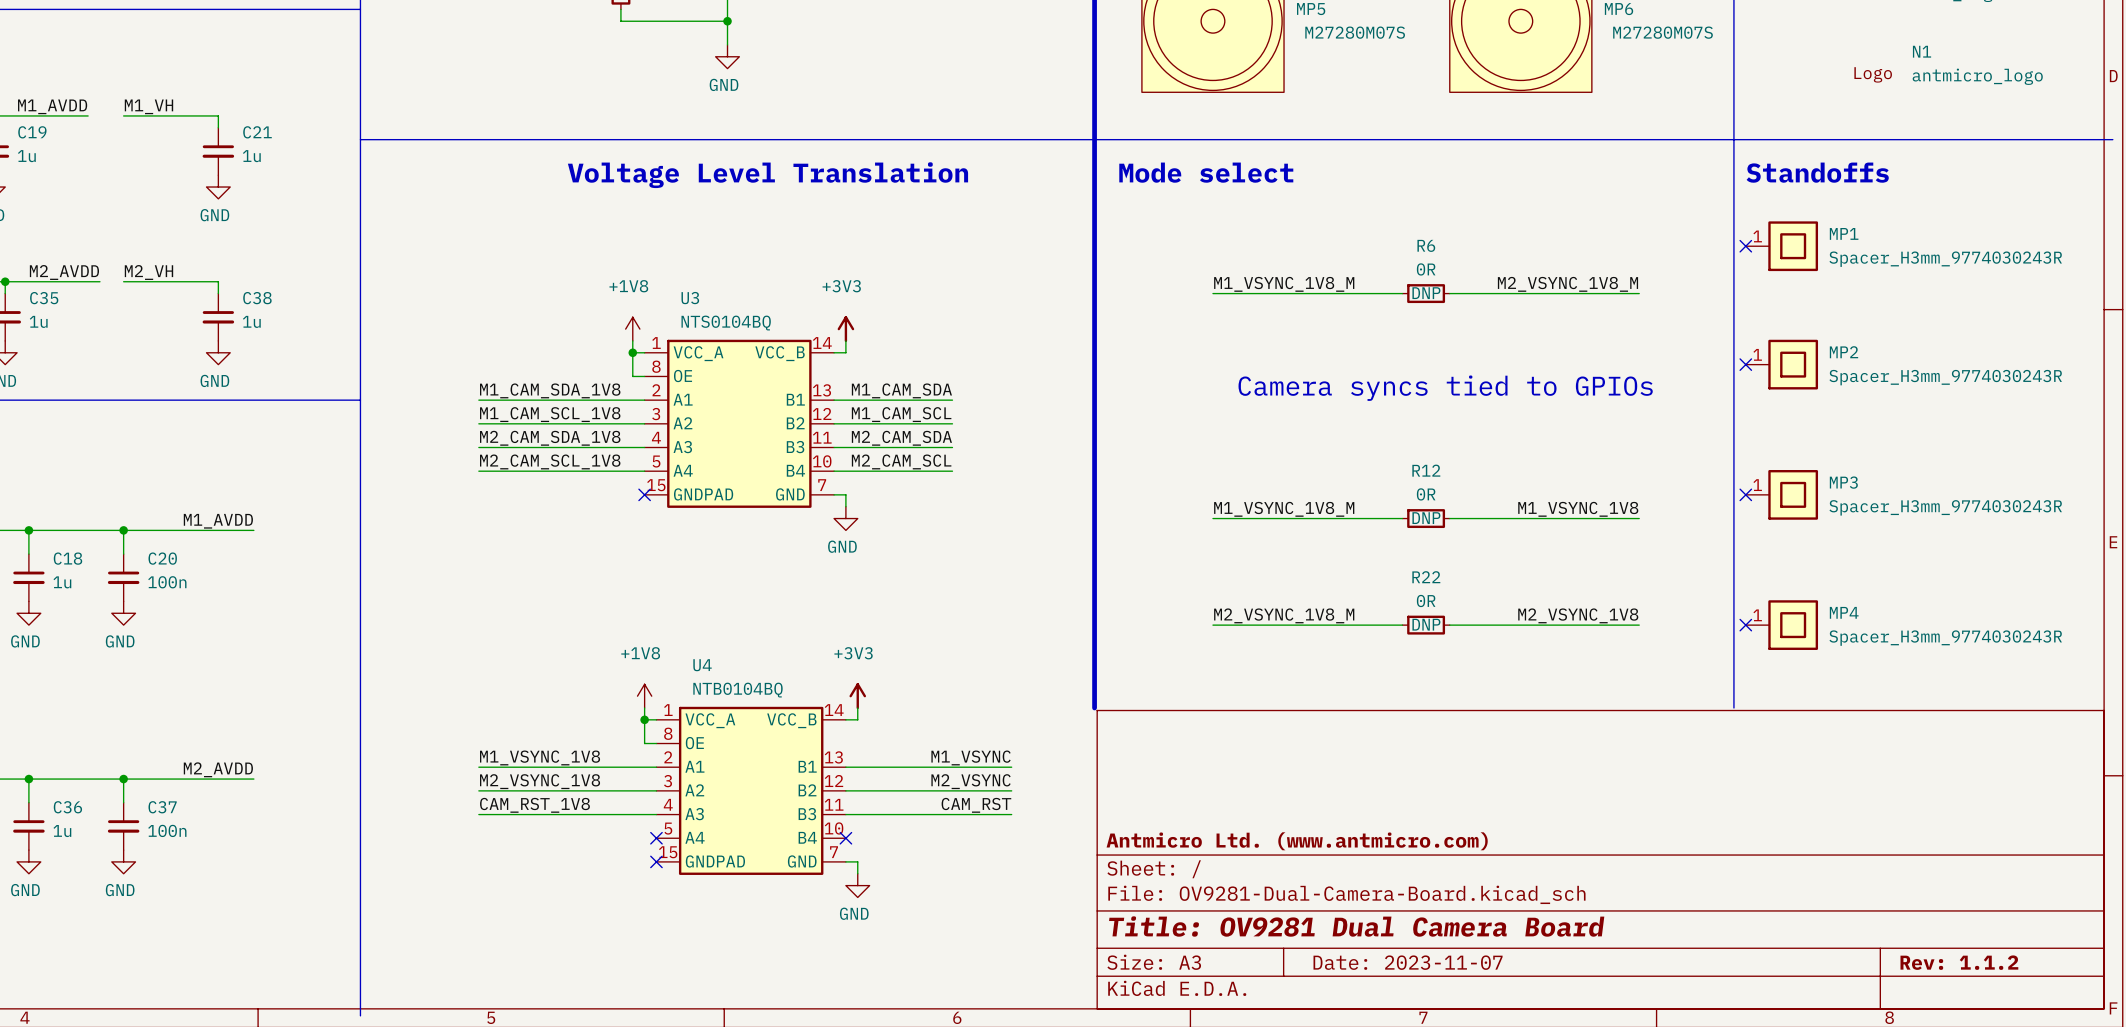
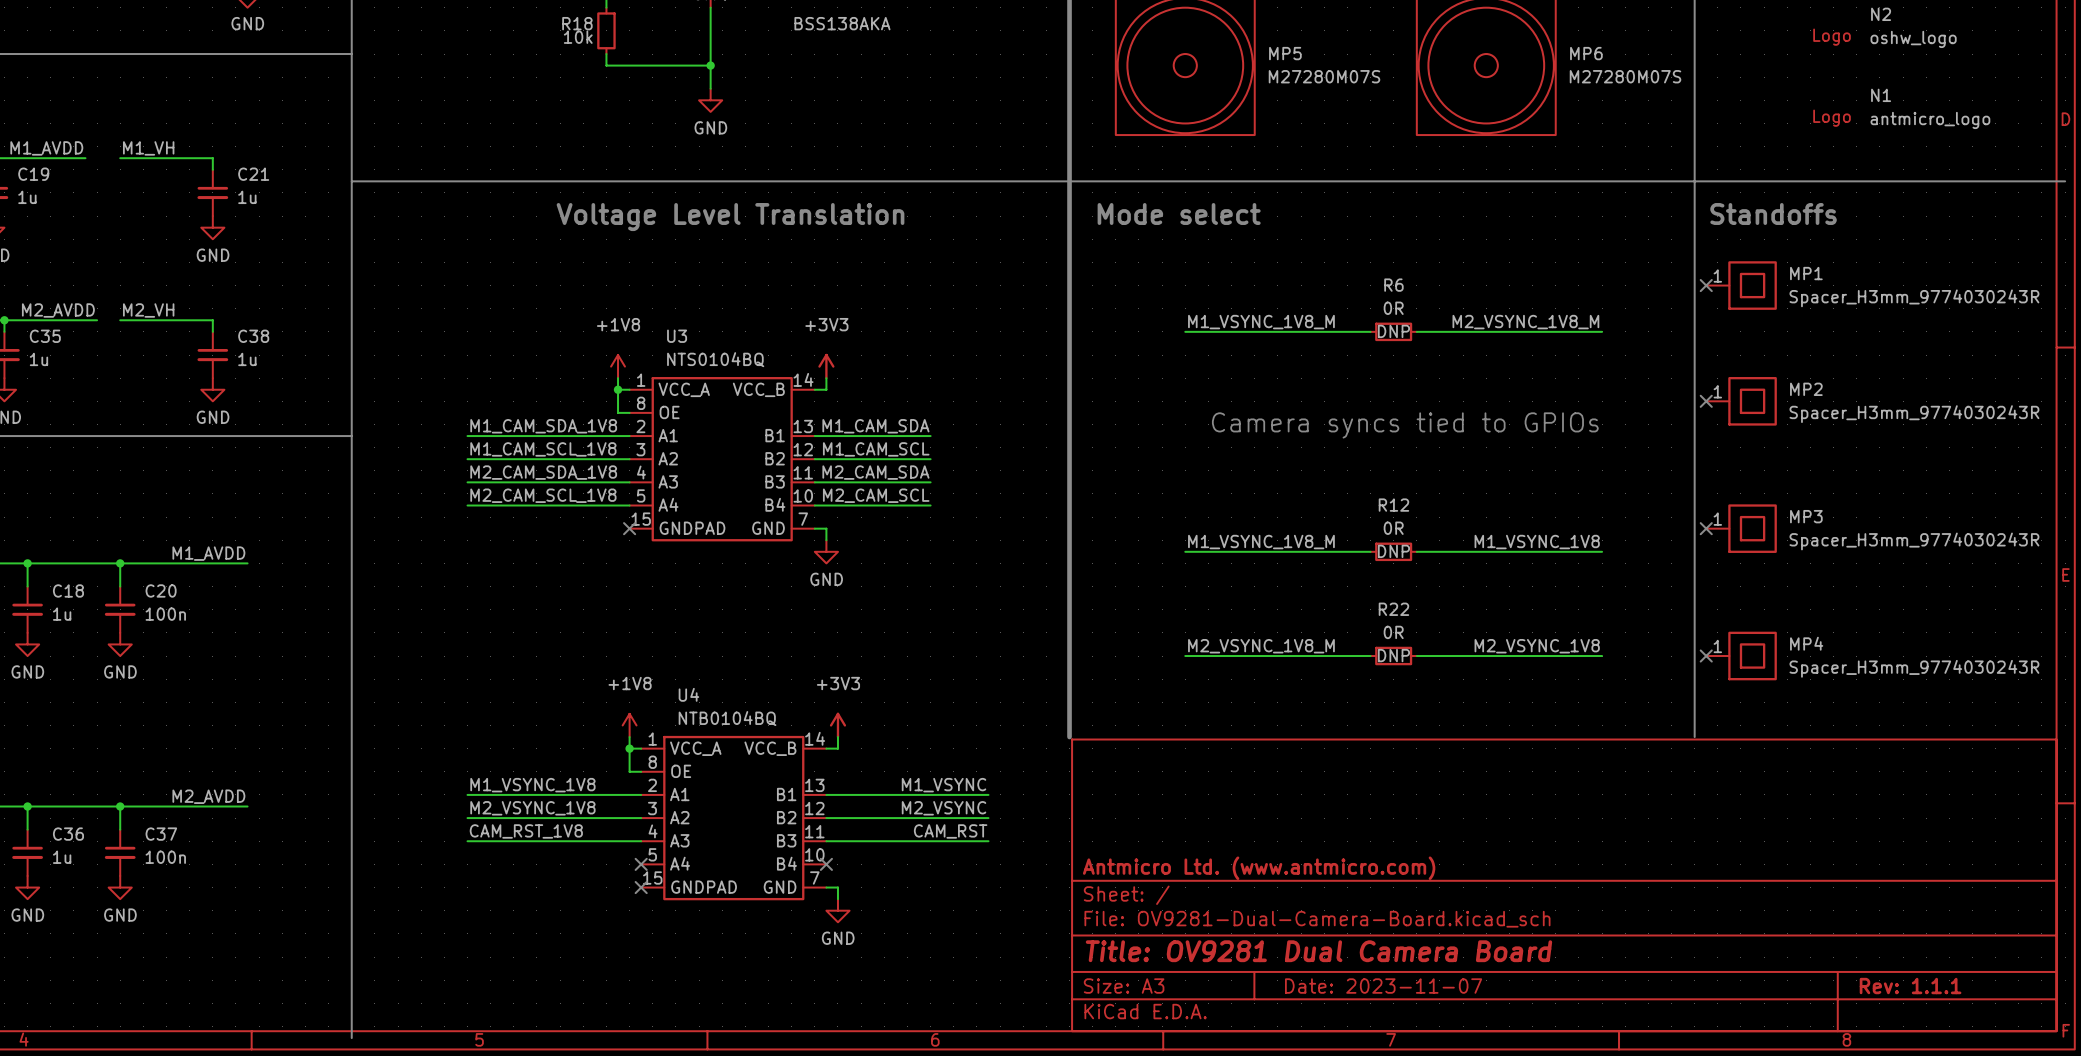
title block: Rev: 1.1.2 (1959, 962) -> Rev: 1.1.1 (1910, 986)

